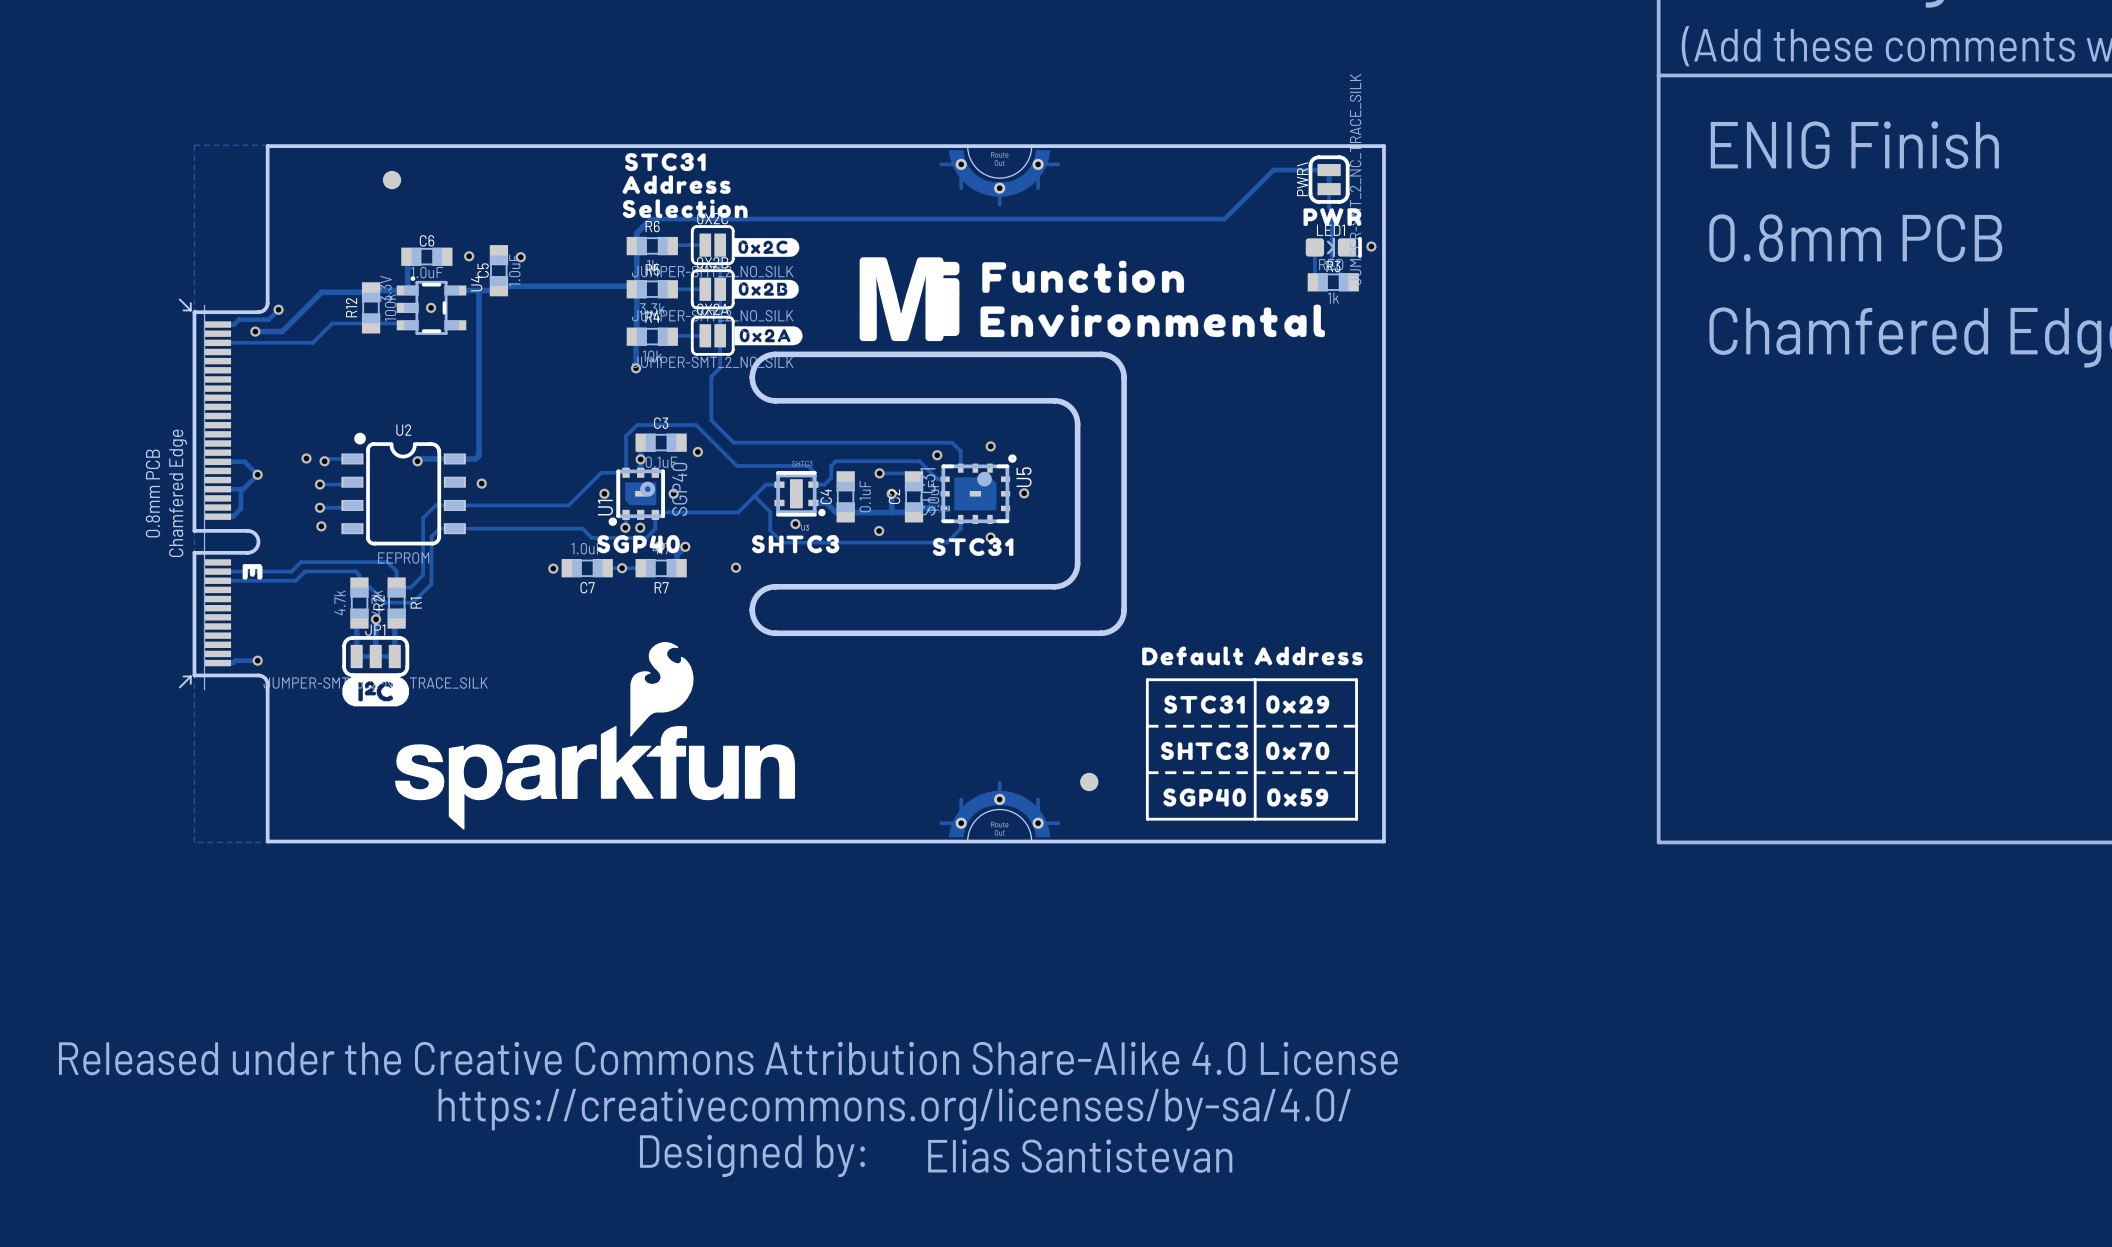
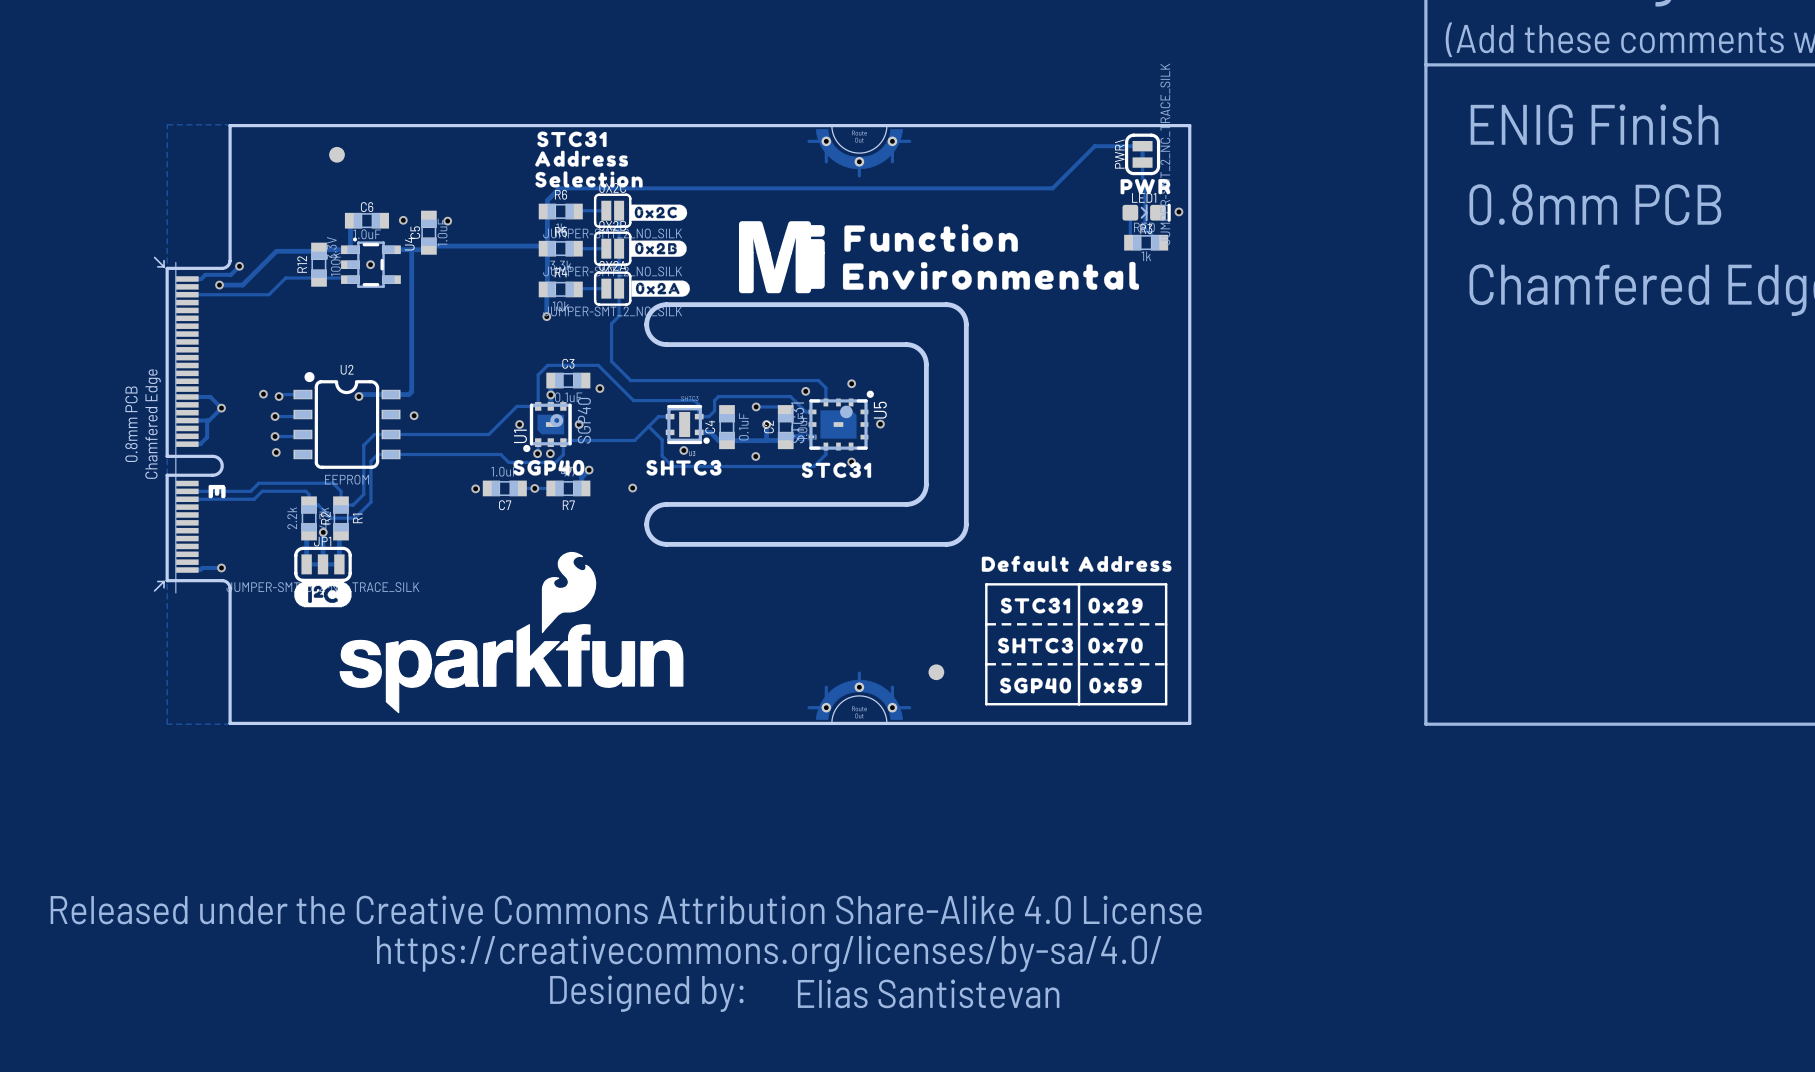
R2 value: 4.7k (339, 602) -> 2.2k (292, 518)

